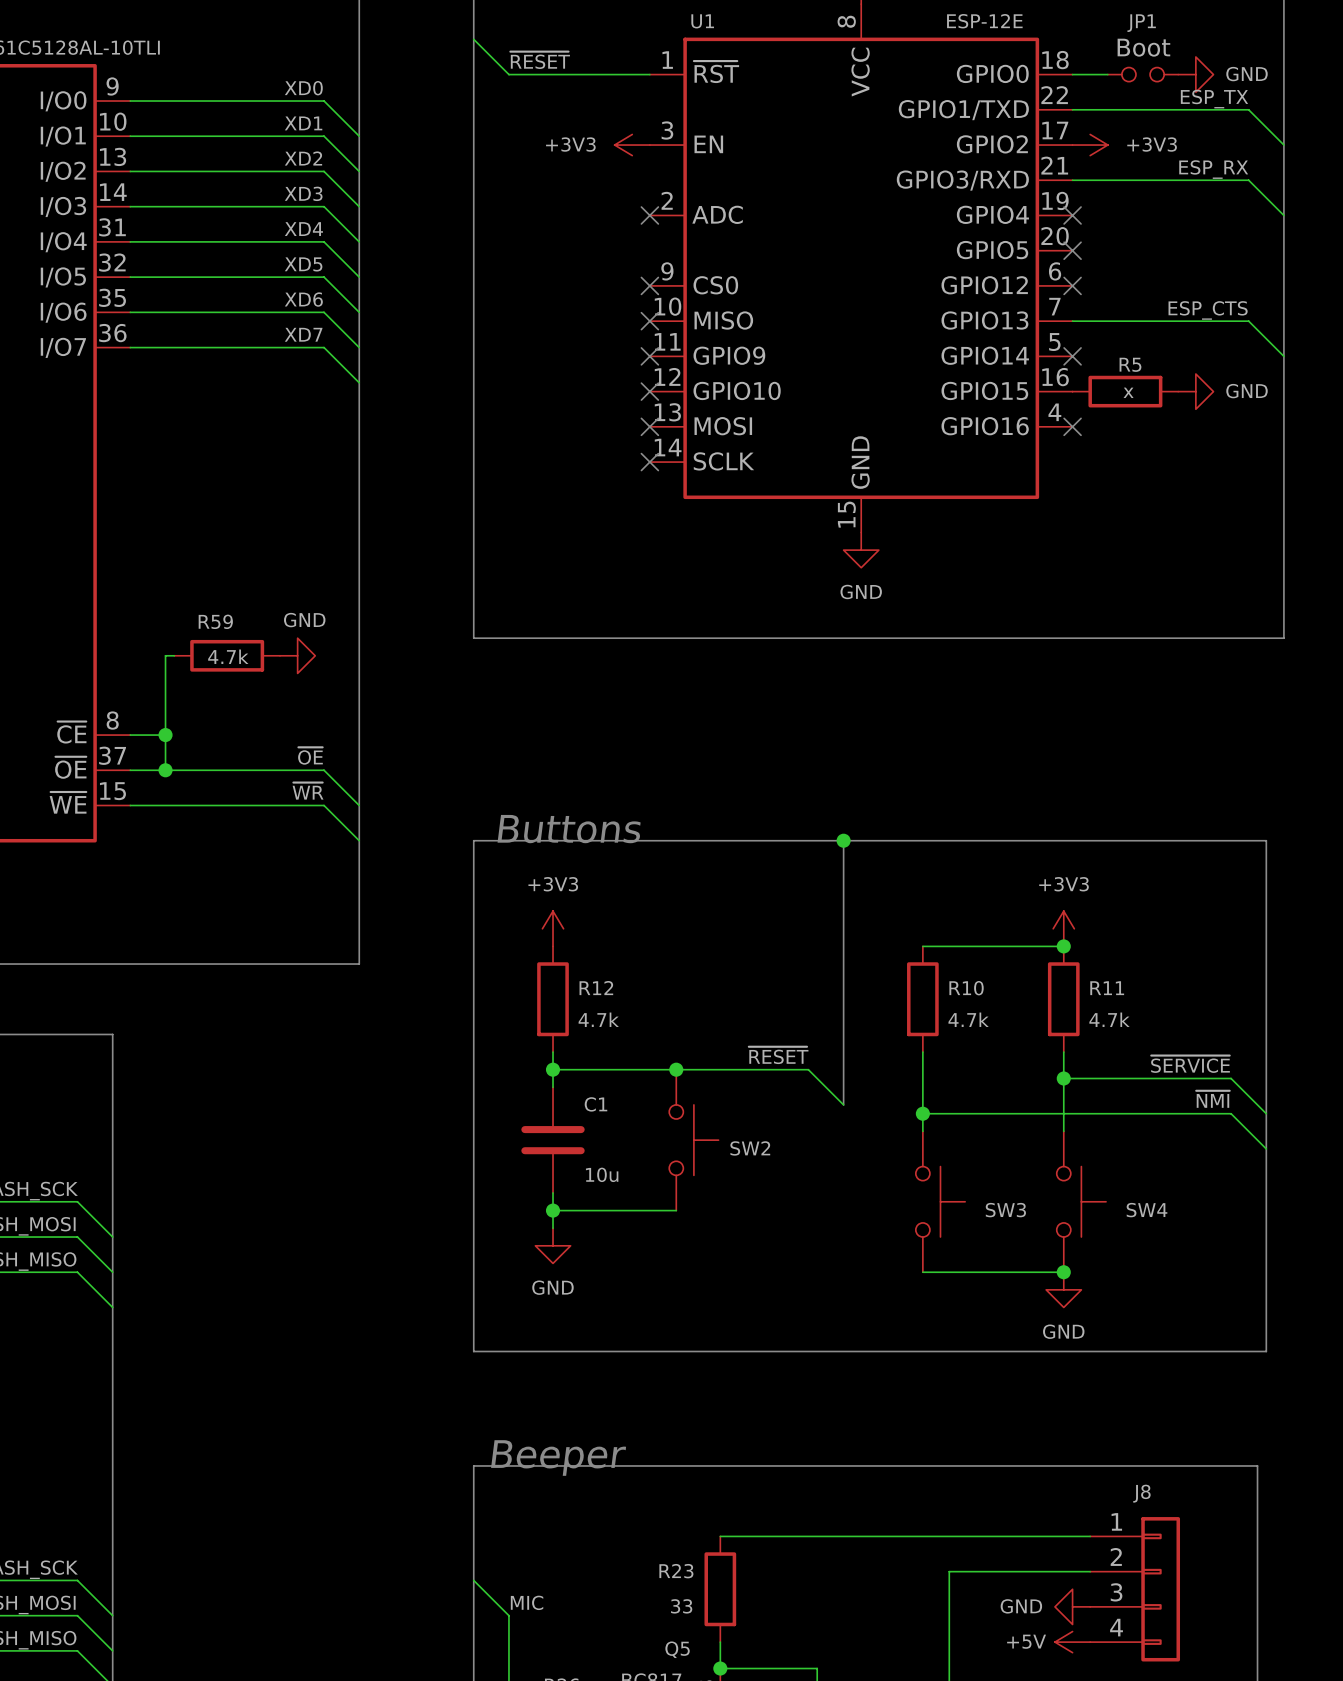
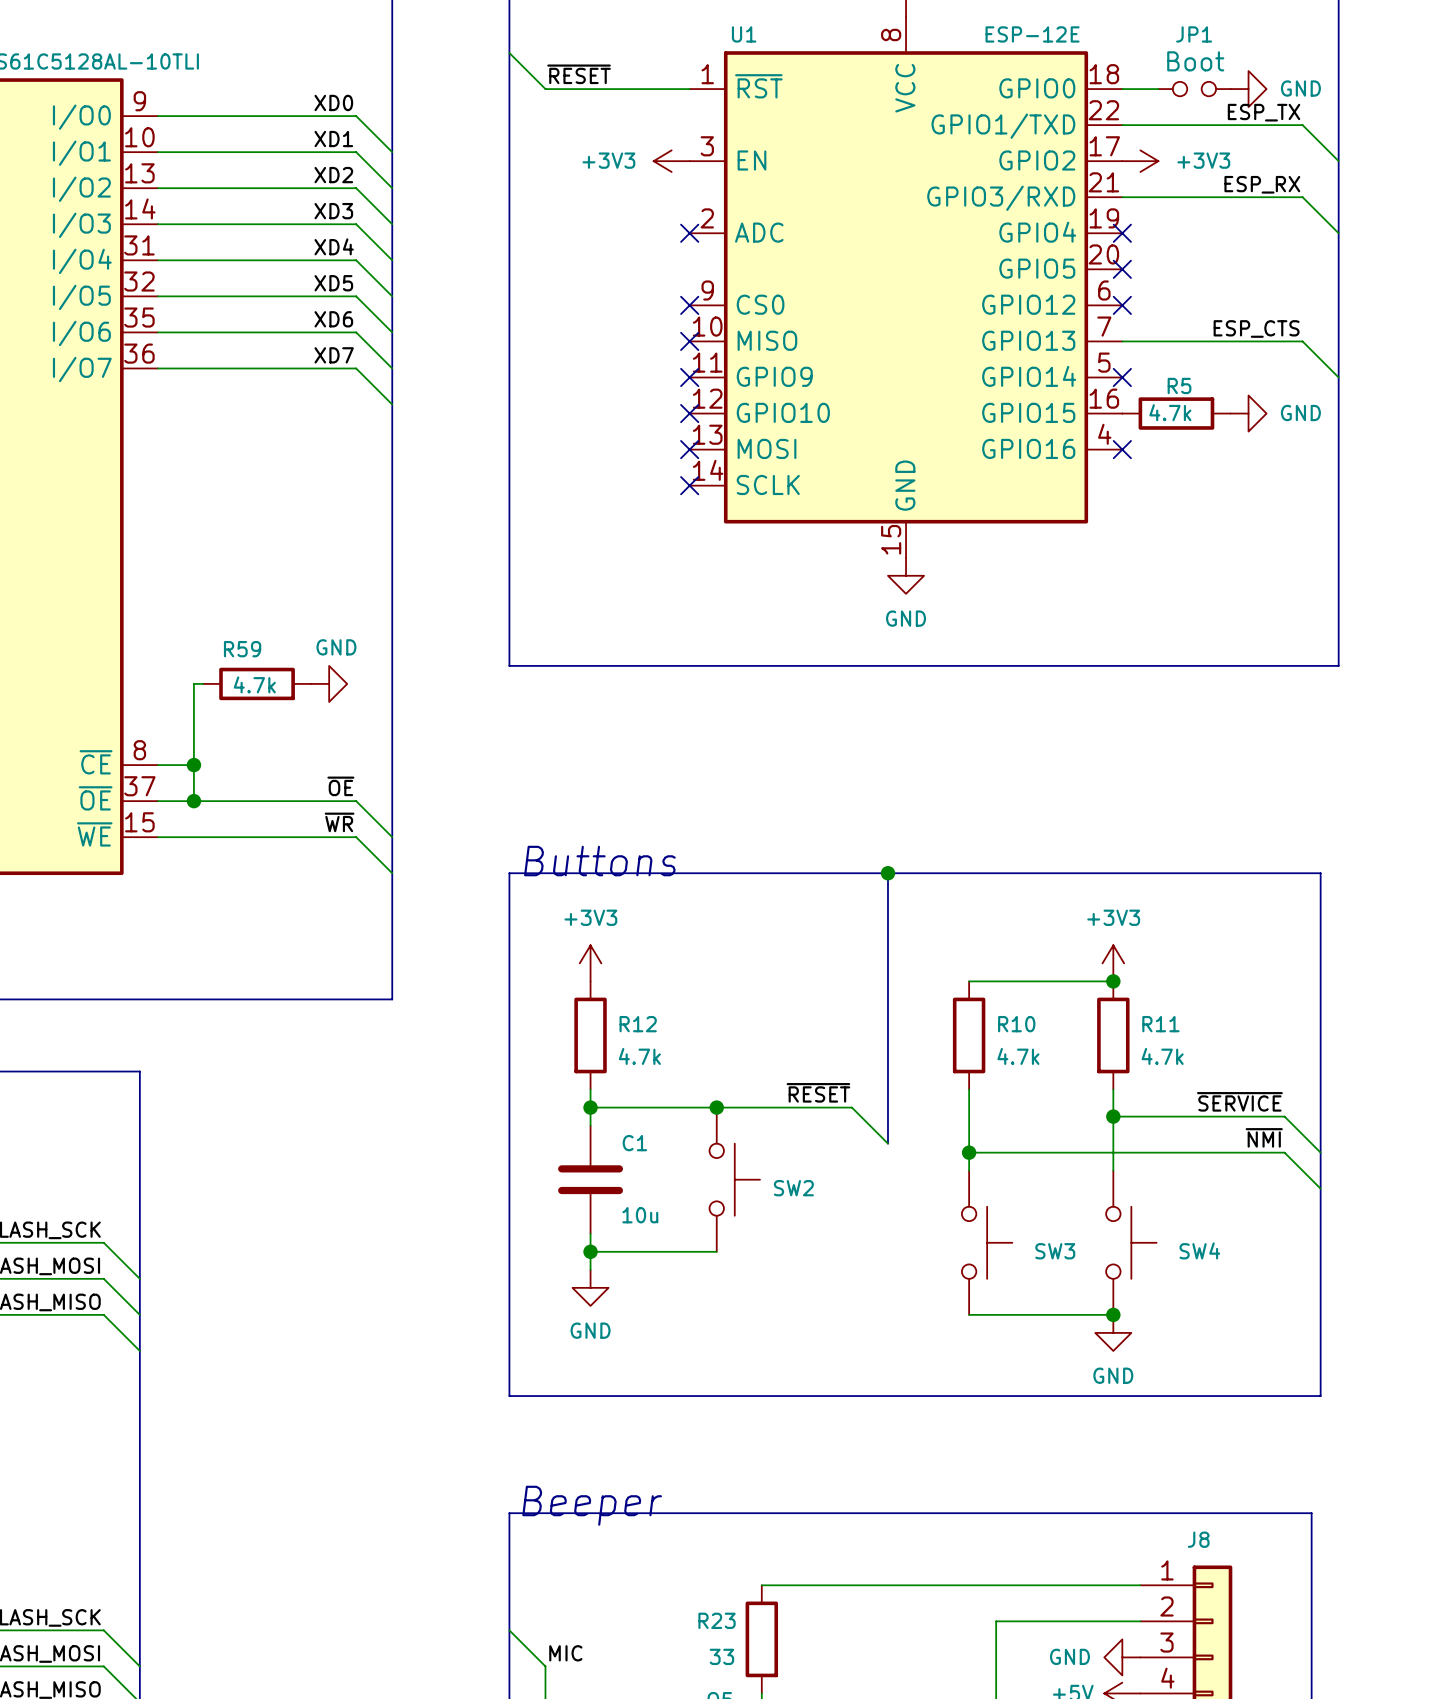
R5 value: x (1128, 392) -> 4.7k (1170, 412)

